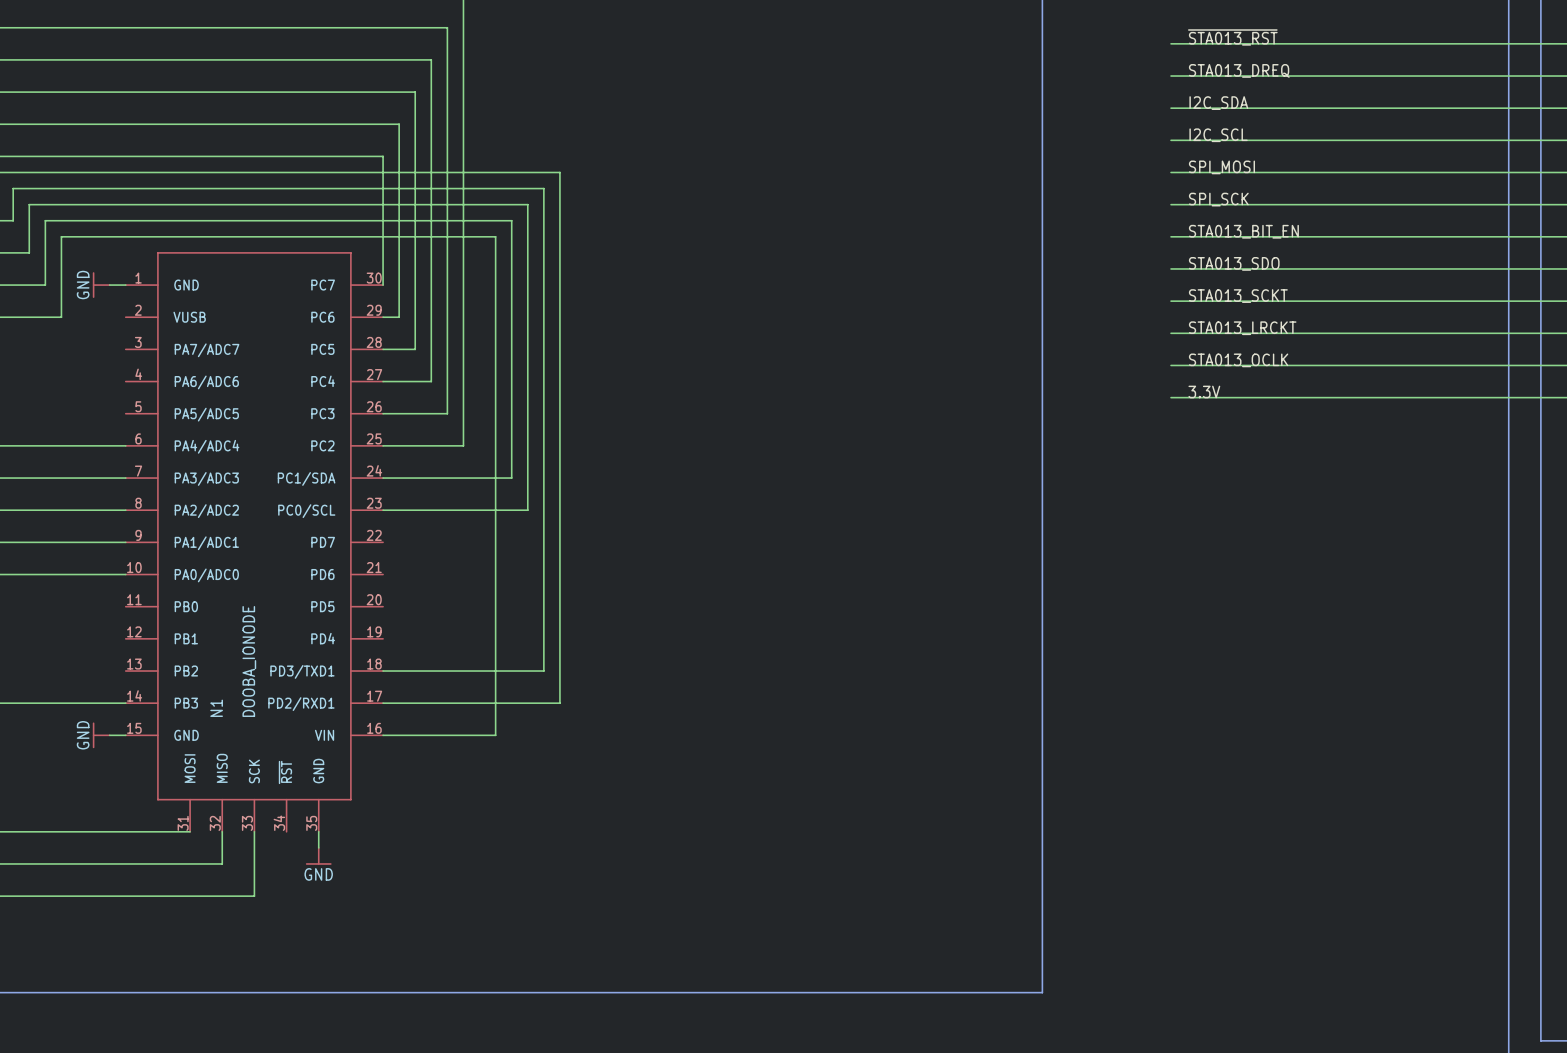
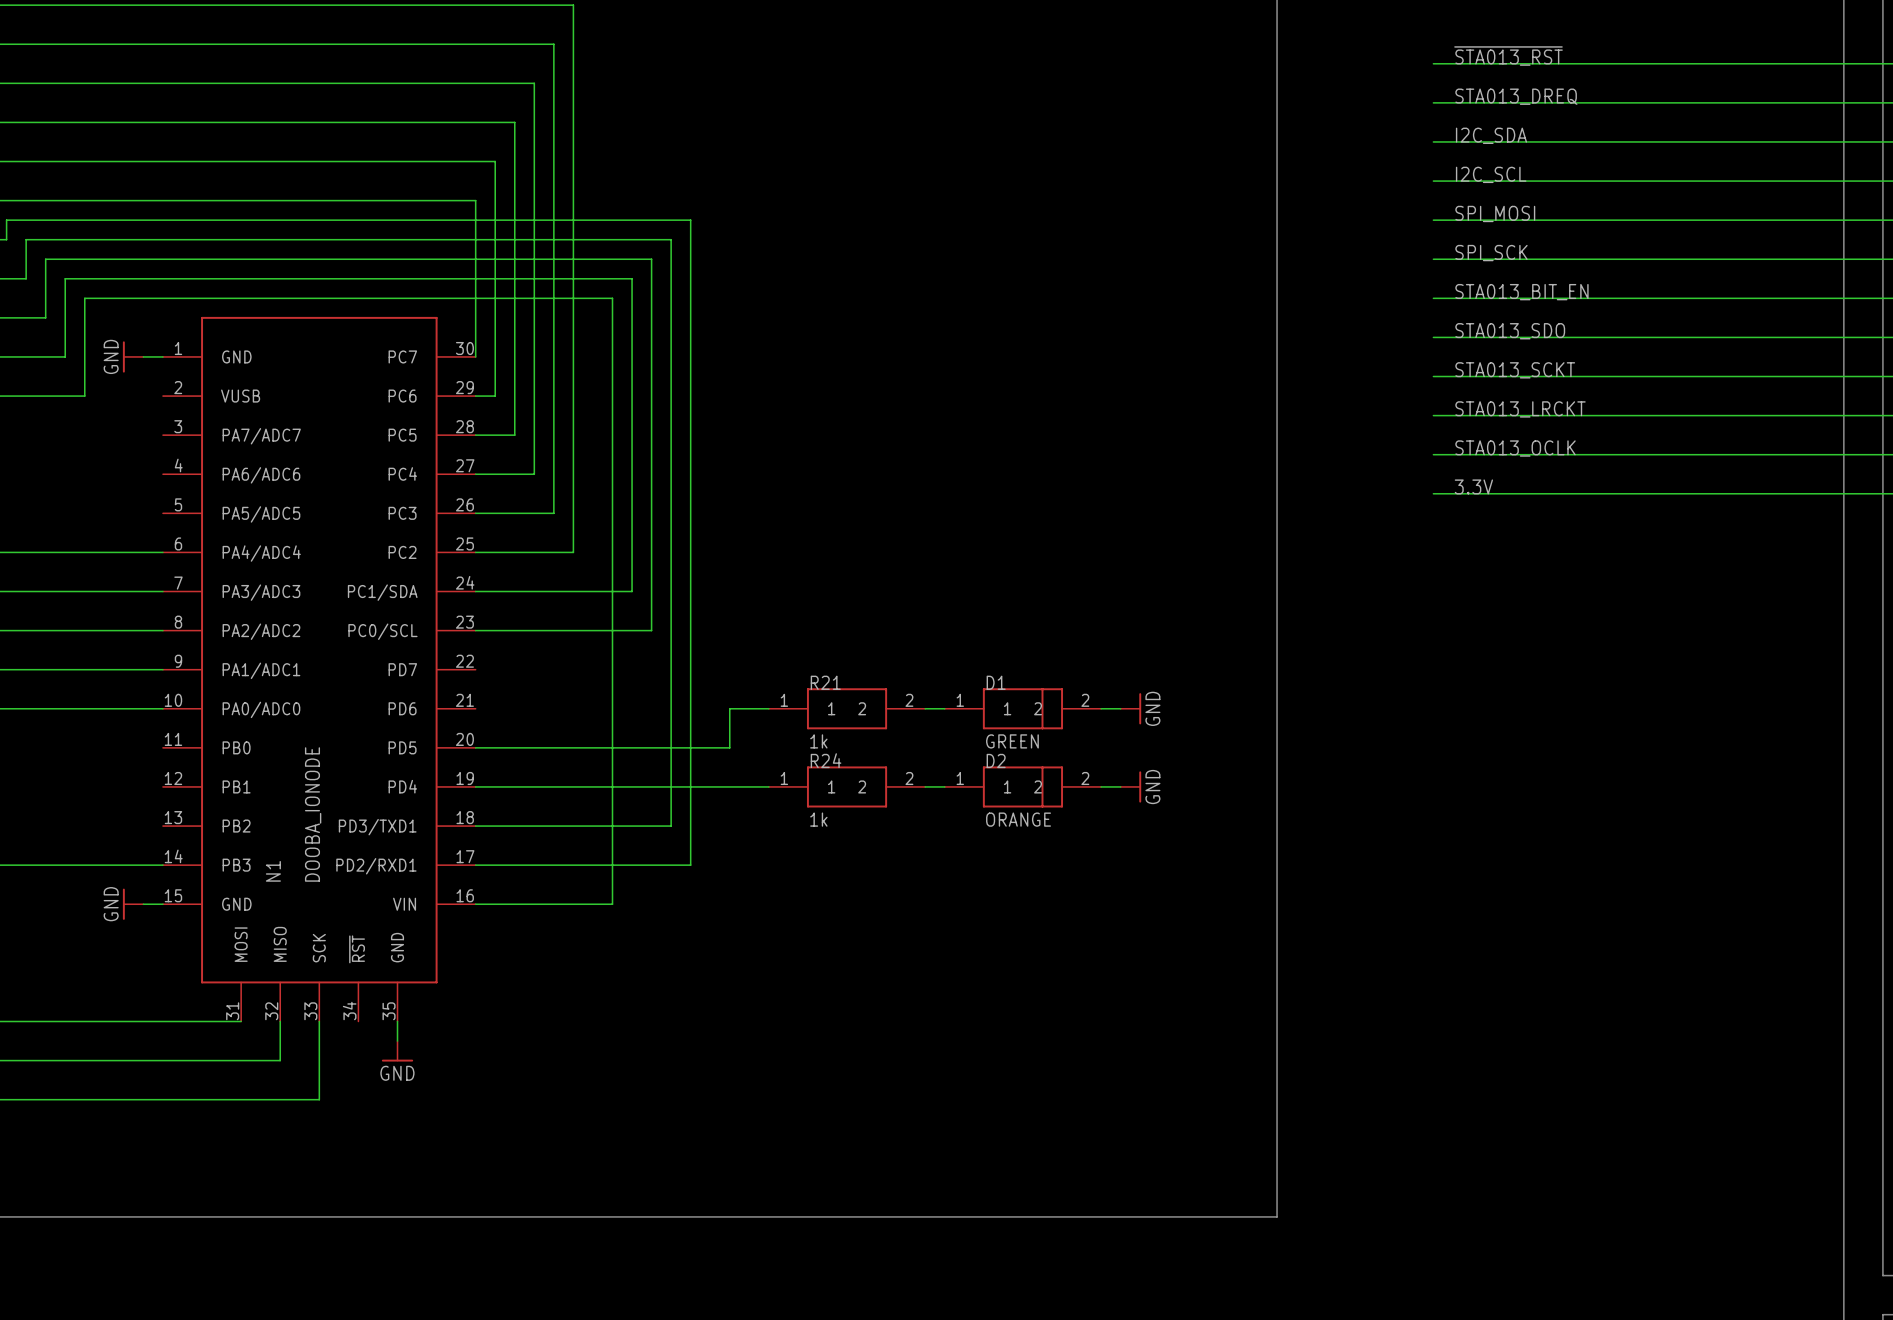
wire: none -> (768, 708) (729, 708) (729, 747) (475, 747)
R21: none -> 1k (847, 708)
wire: none -> (925, 708) (944, 708)
D1: none -> GREEN (1022, 708)
wire: none -> (1101, 708) (1120, 708)
power symbol: none -> GND (1130, 708)
wire: none -> (475, 786) (768, 786)
R24: none -> 1k (847, 786)
wire: none -> (925, 786) (944, 786)
D2: none -> ORANGE (1022, 786)
wire: none -> (1101, 786) (1120, 786)
power symbol: none -> GND (1130, 786)

